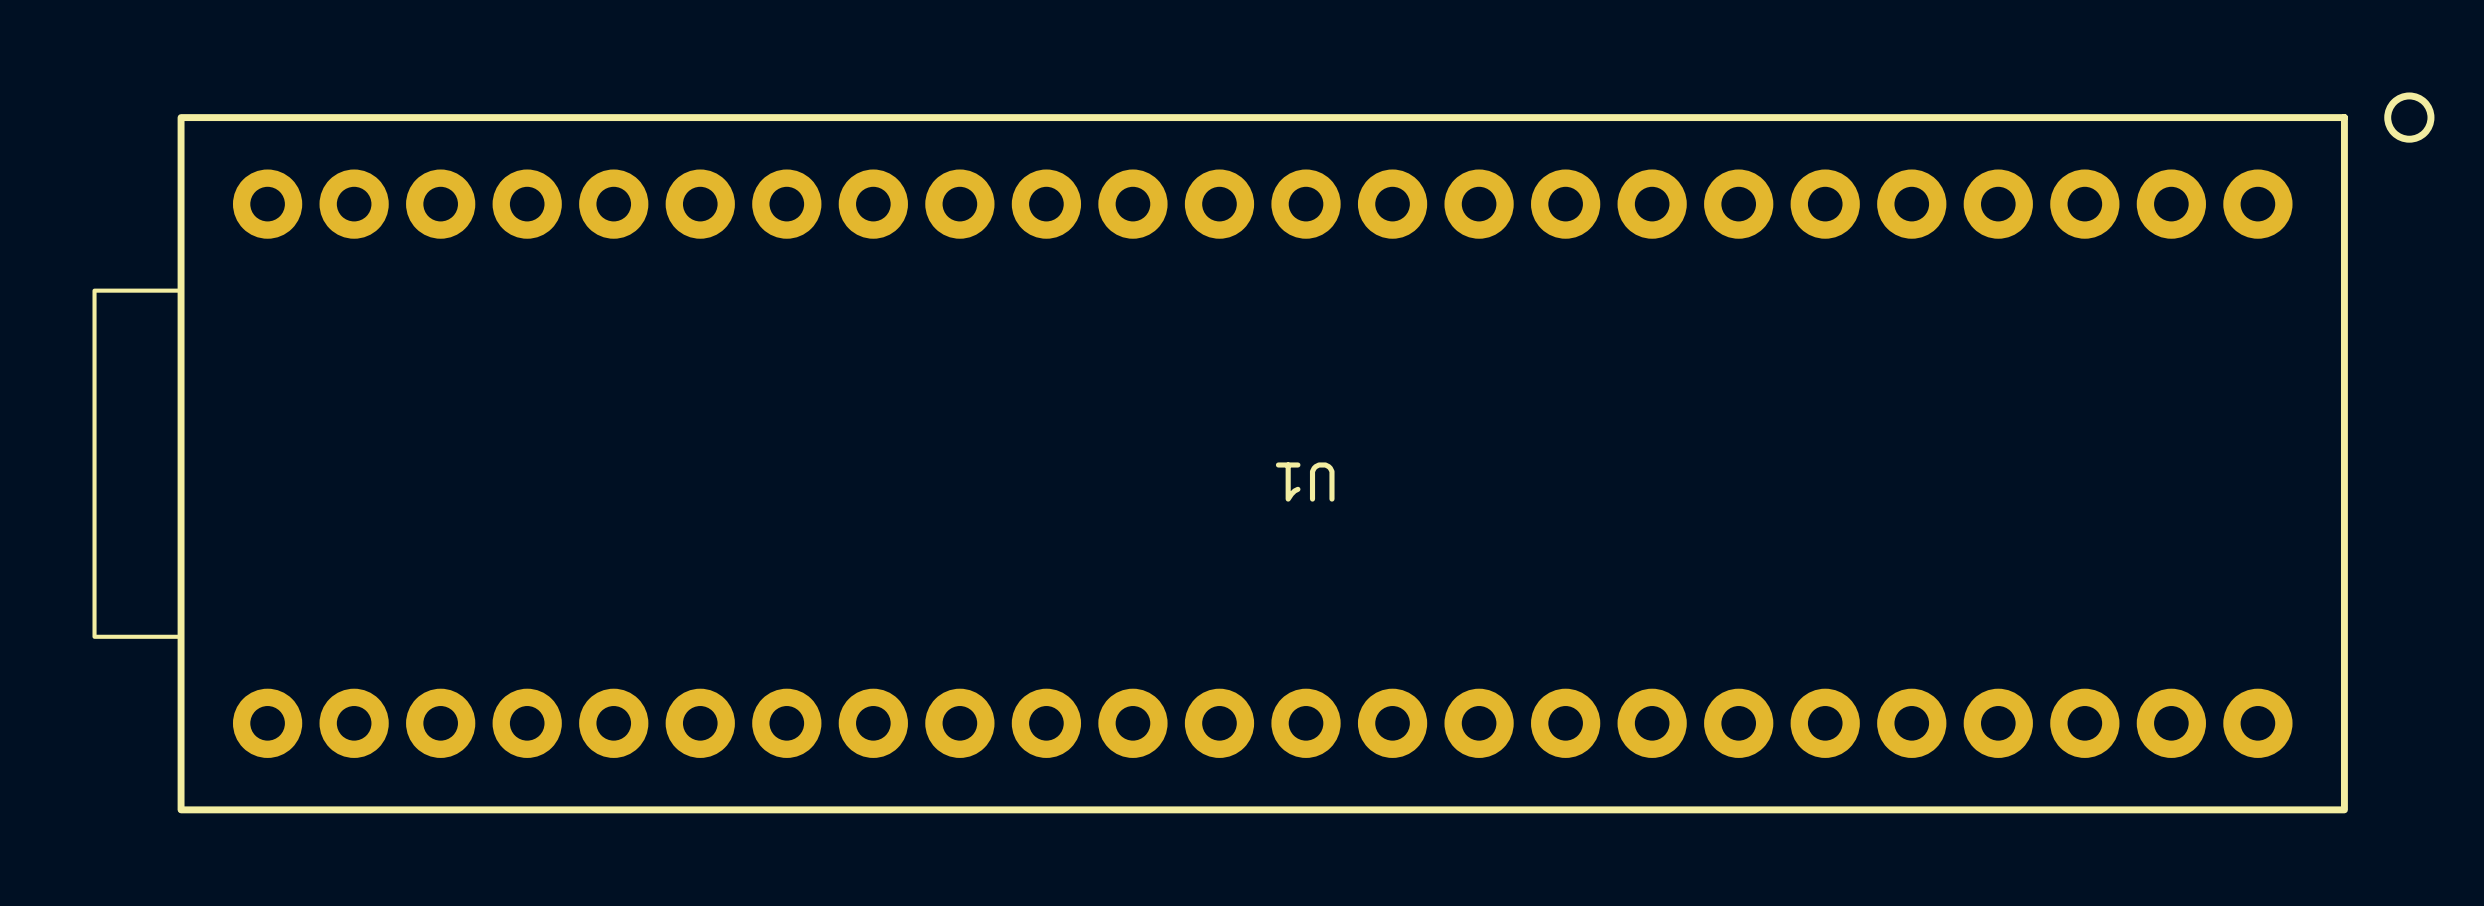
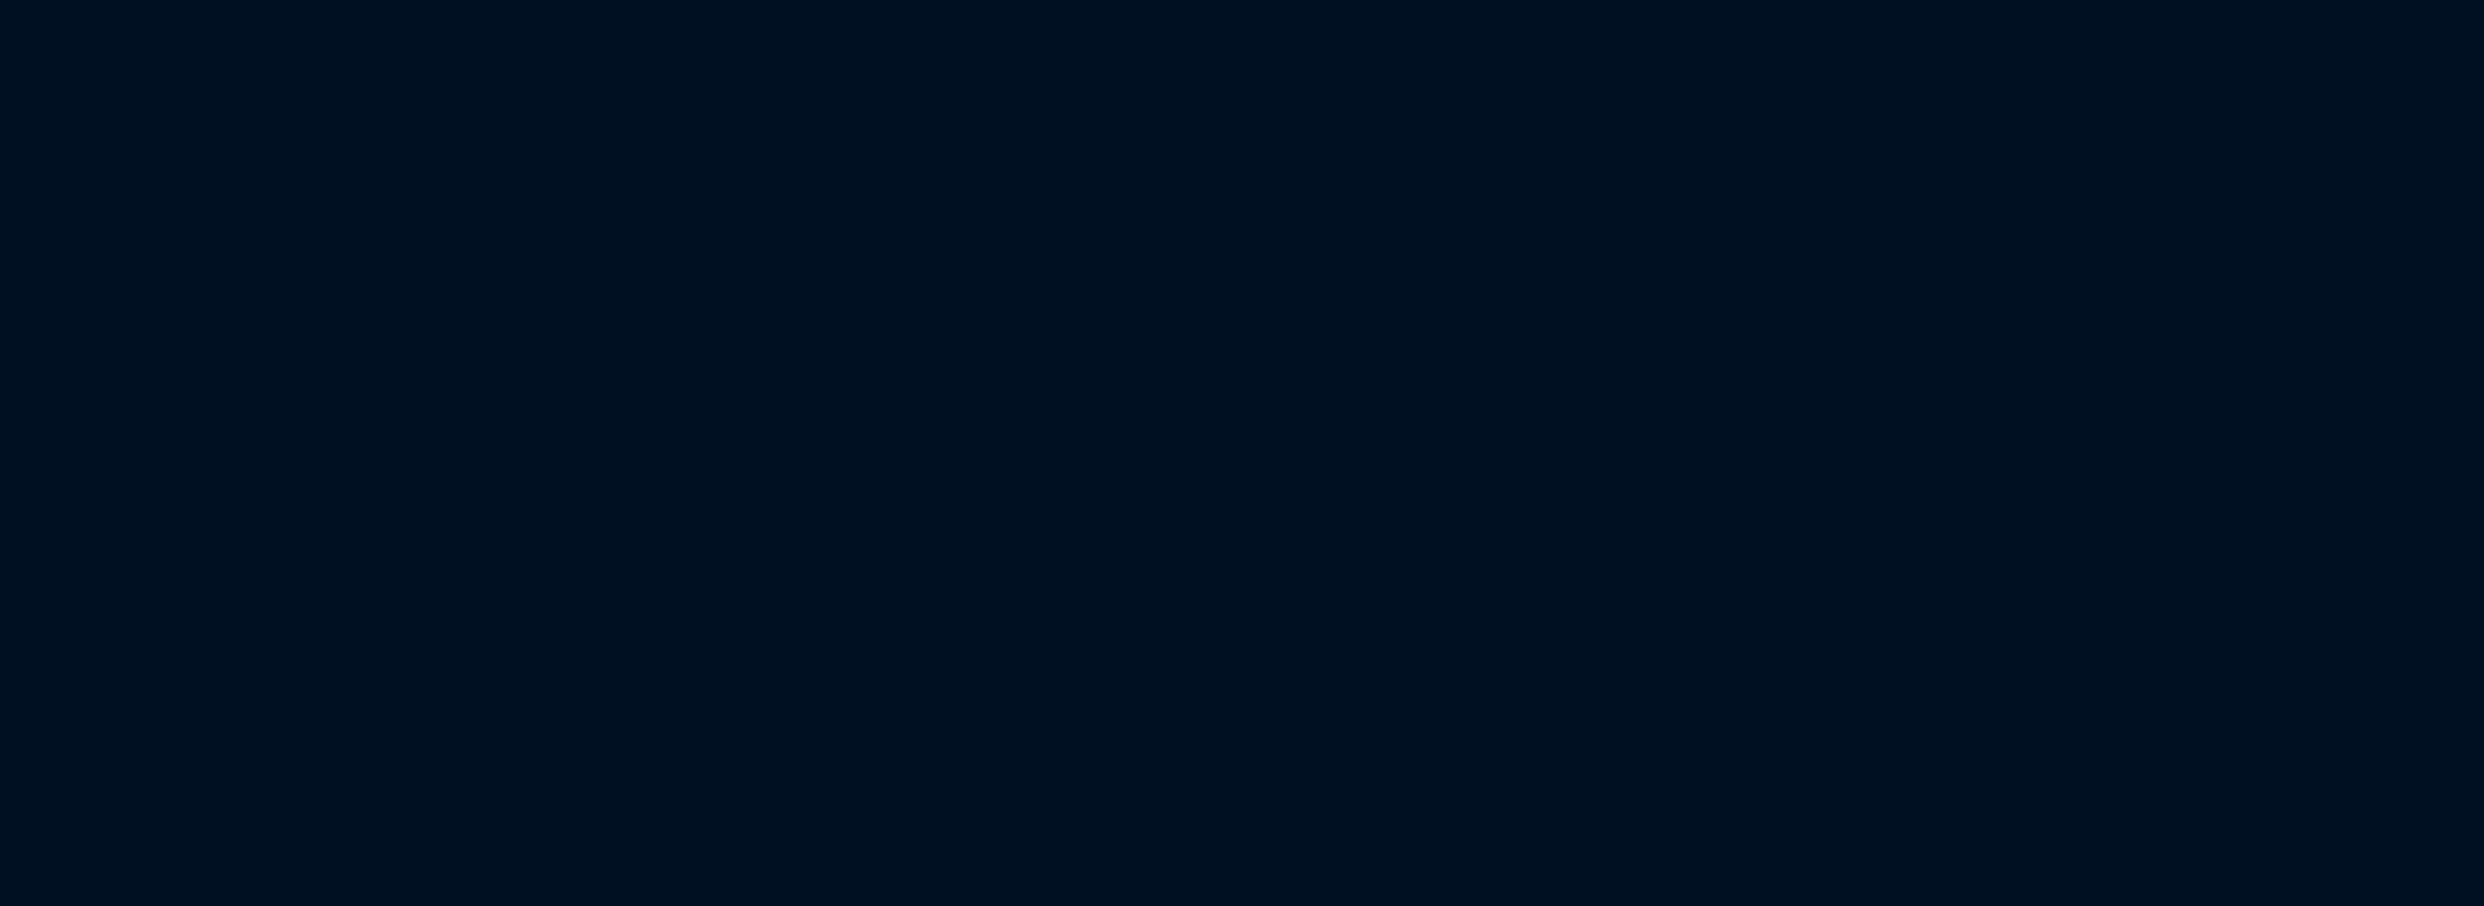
U1: (1263, 452) -> none

